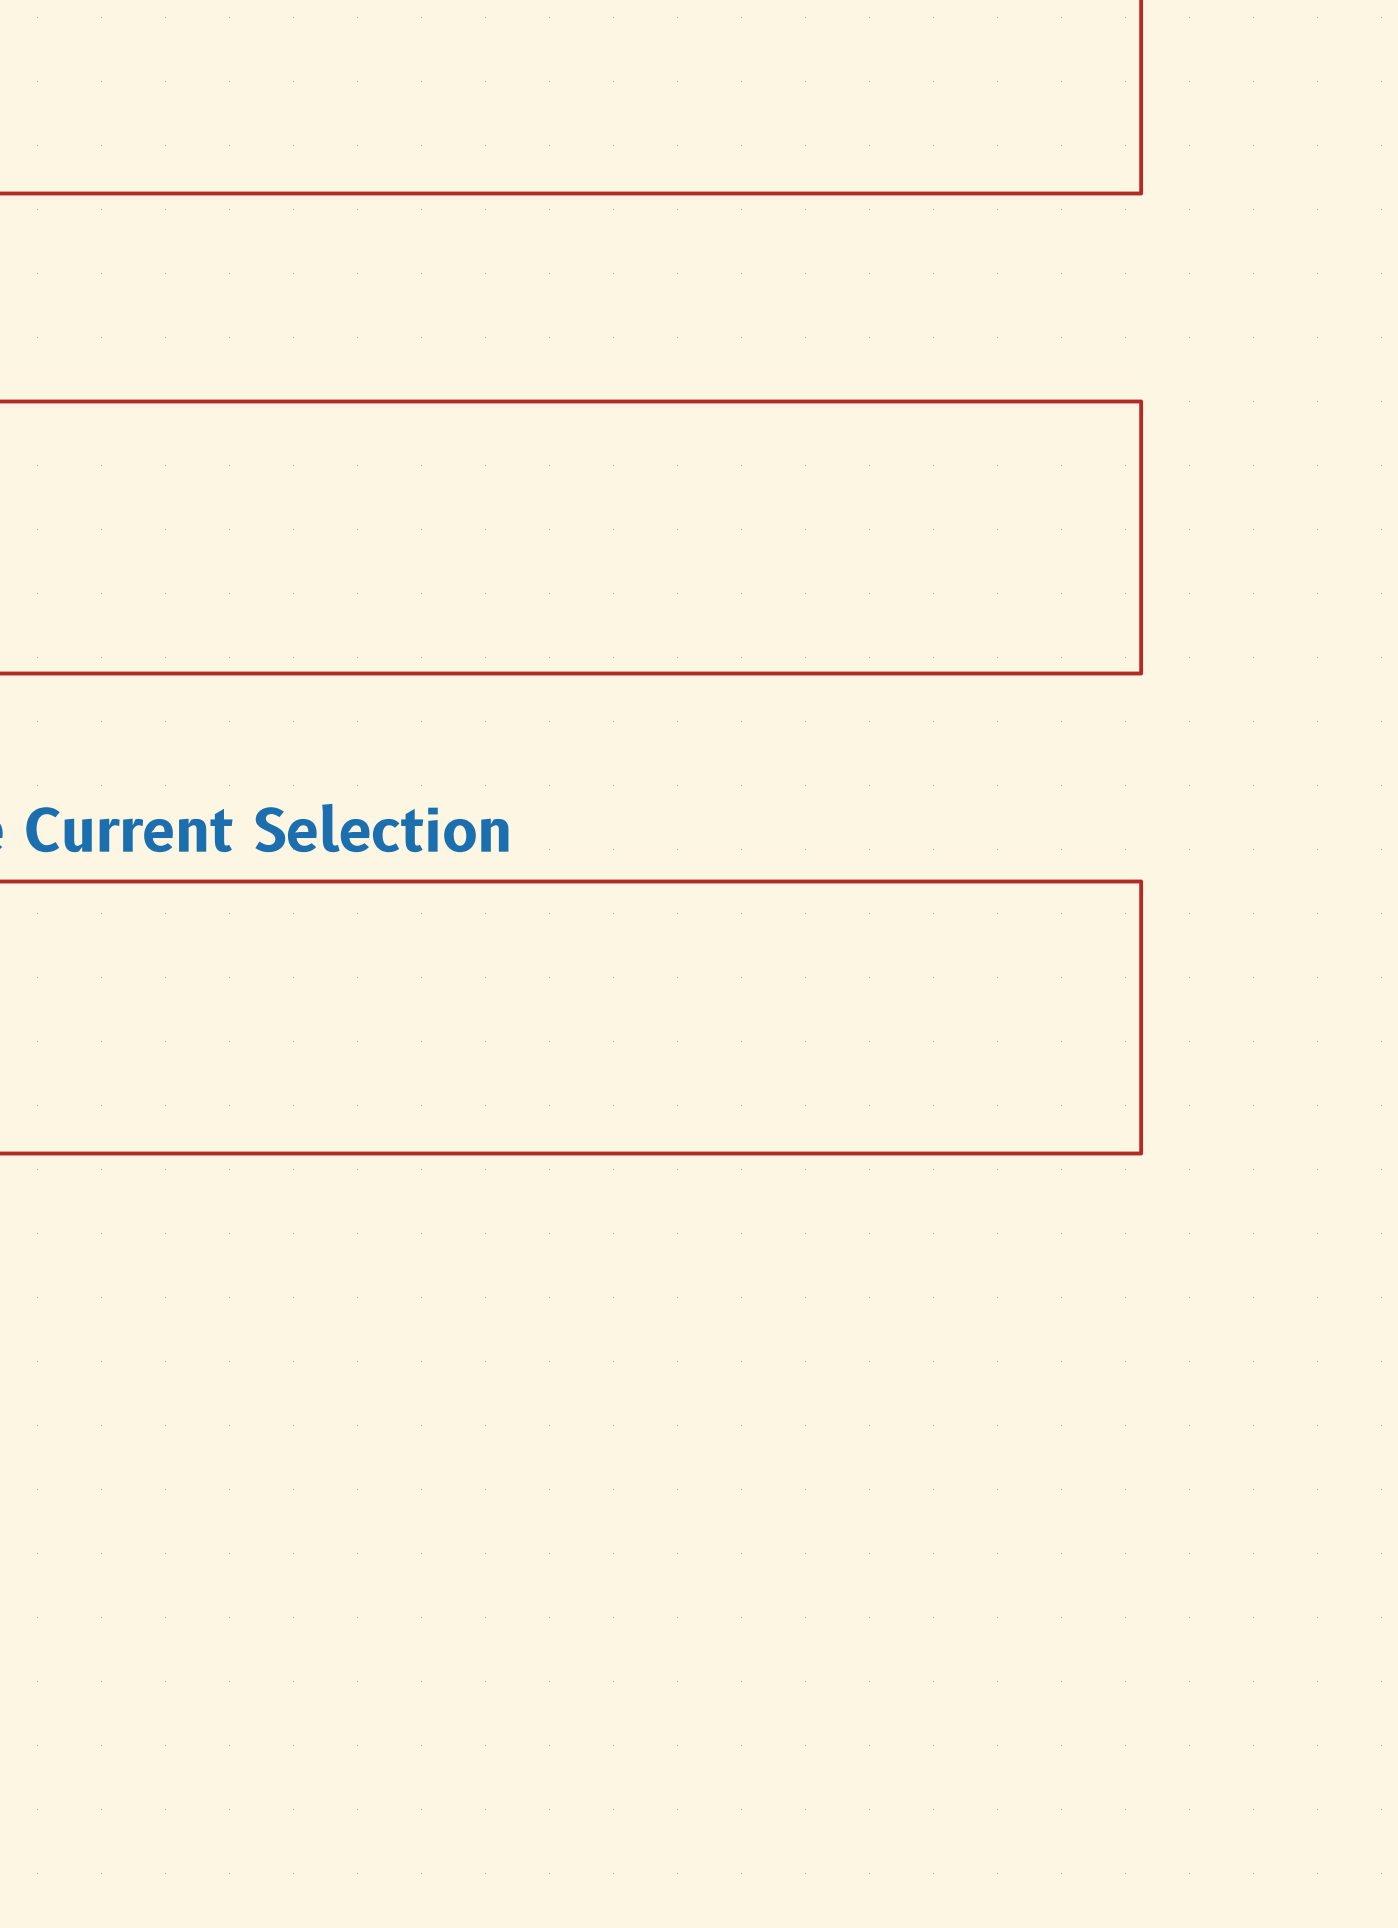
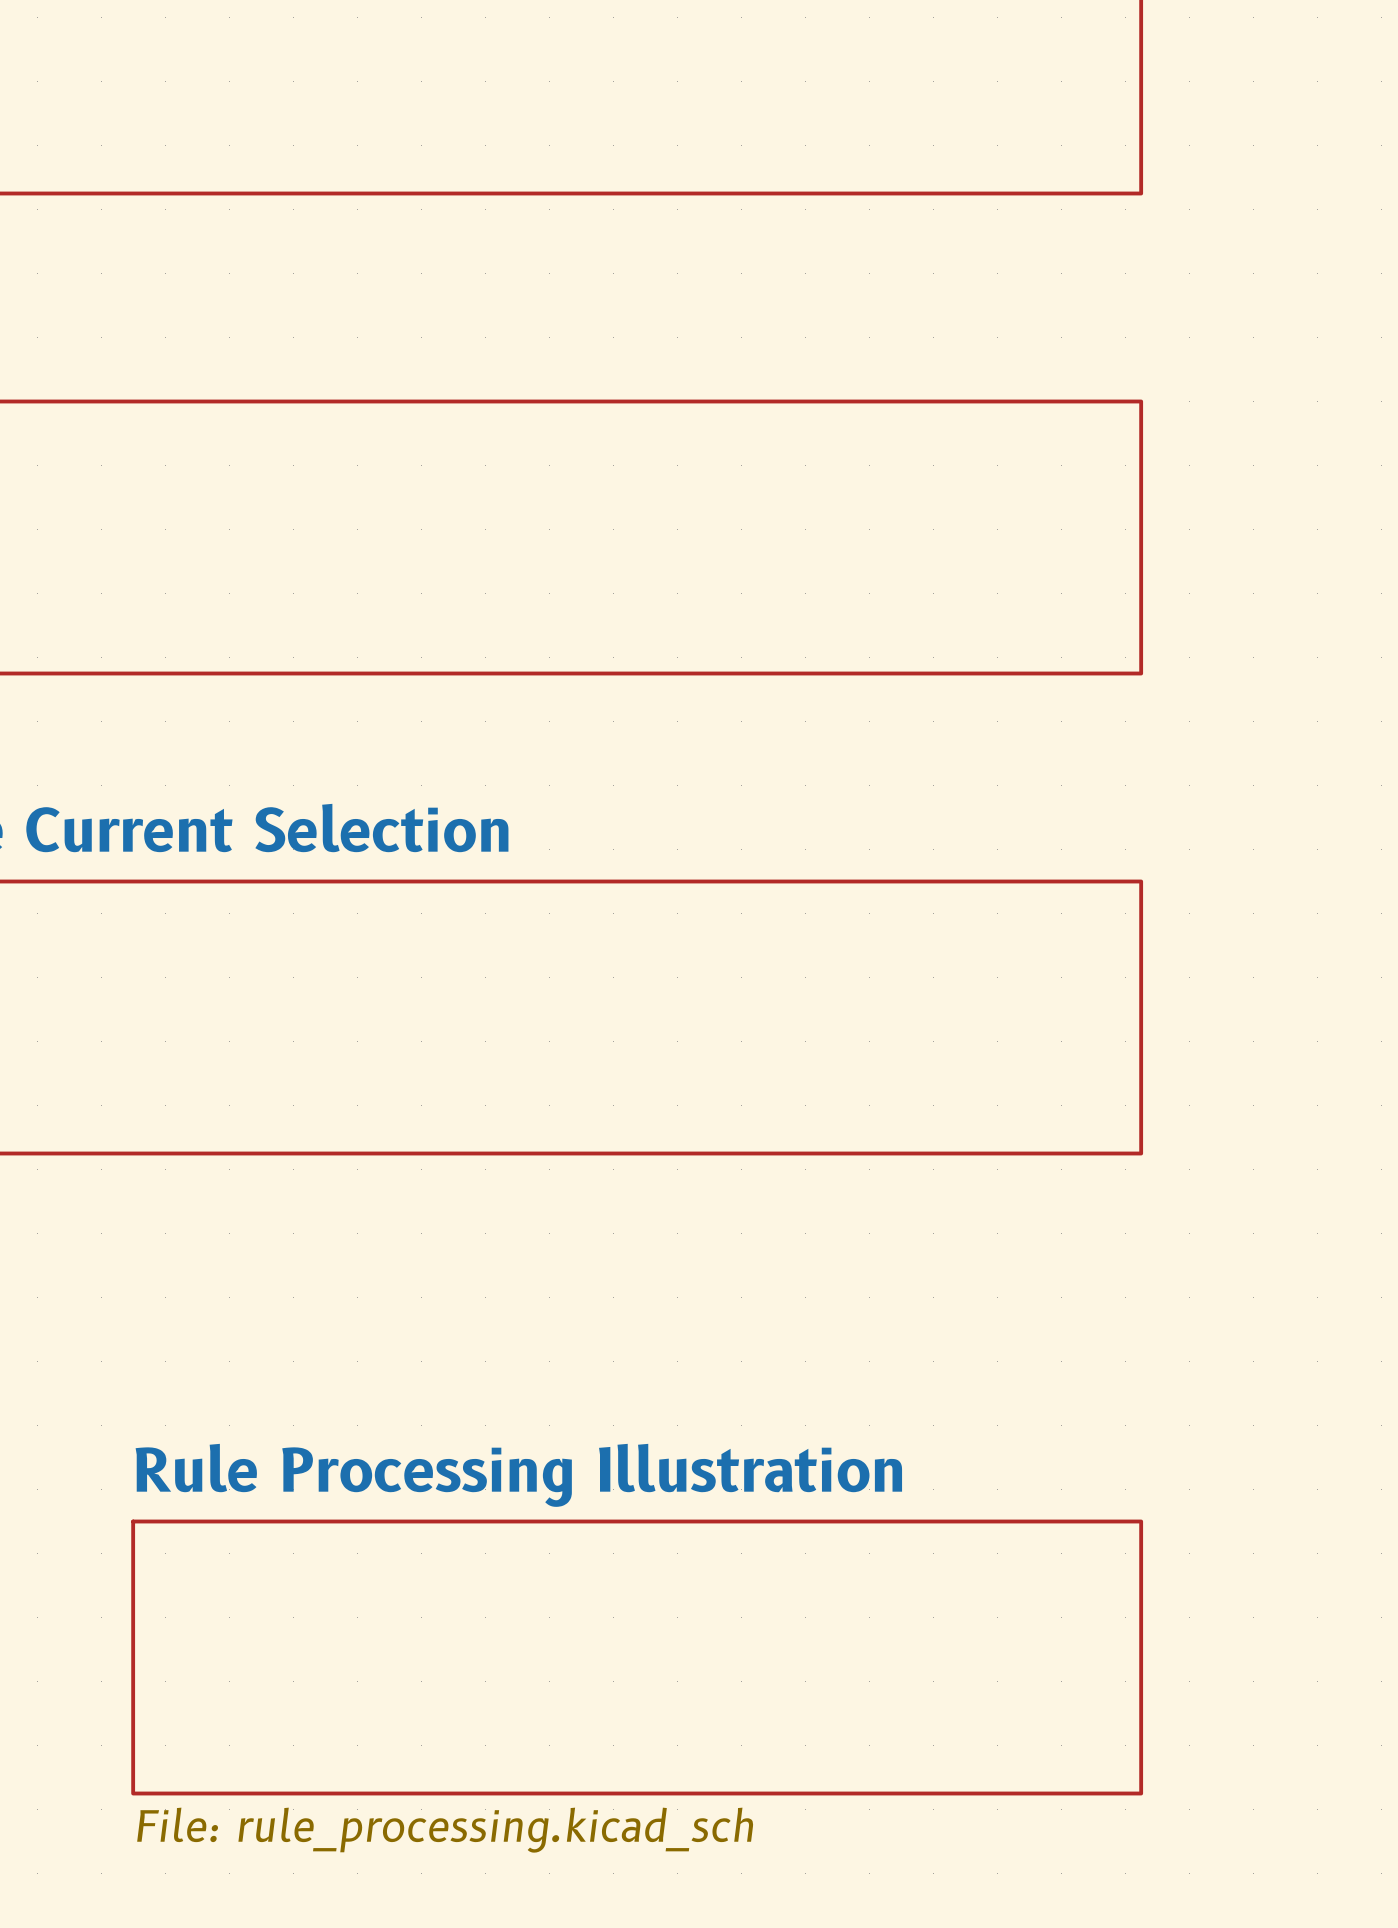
sheet Rule Processing Illustration: none -> File: rule_processing.kicad_sch (637, 1657)

